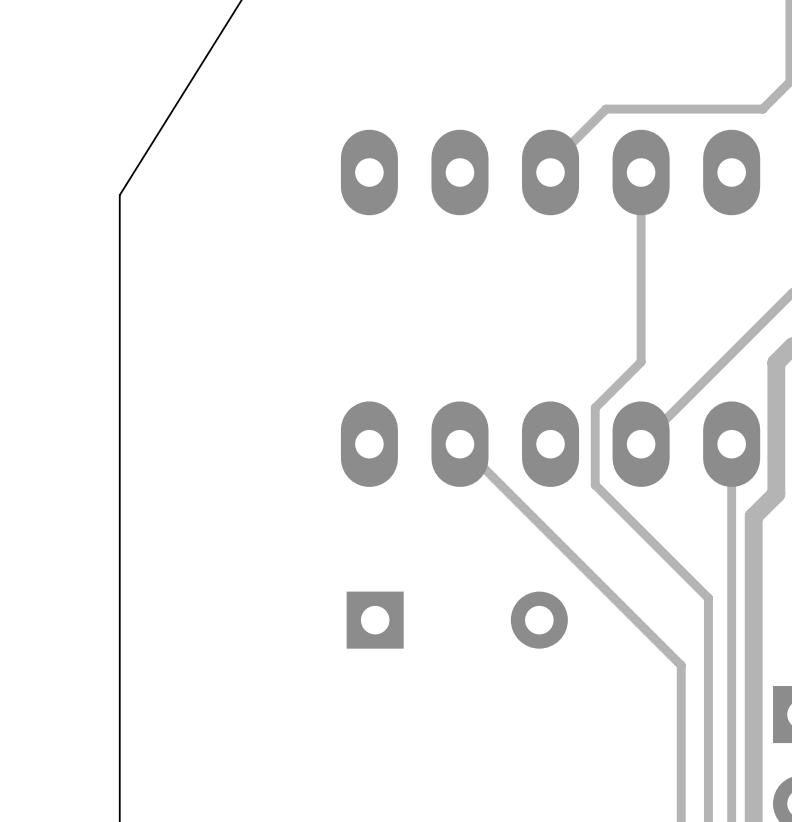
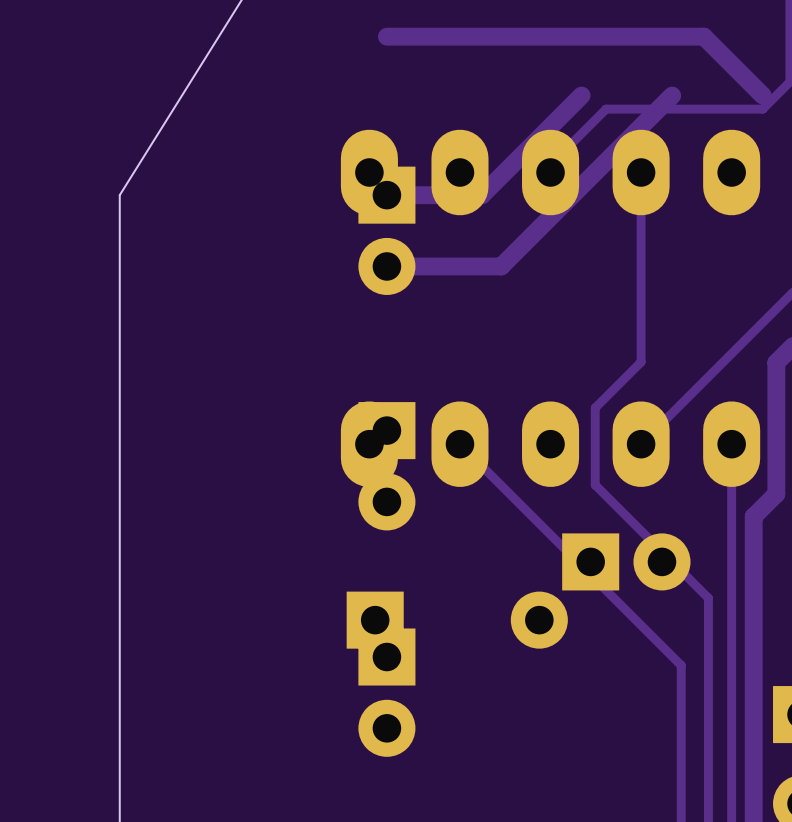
track: none -> (386, 36) (703, 36) (762, 95)
track: none -> (581, 95) (482, 195) (386, 195)
track: none -> (672, 95) (501, 266) (386, 266)
part: none -> (386, 230)
part: none -> (386, 466)
part: none -> (626, 561)
part: none -> (386, 692)

